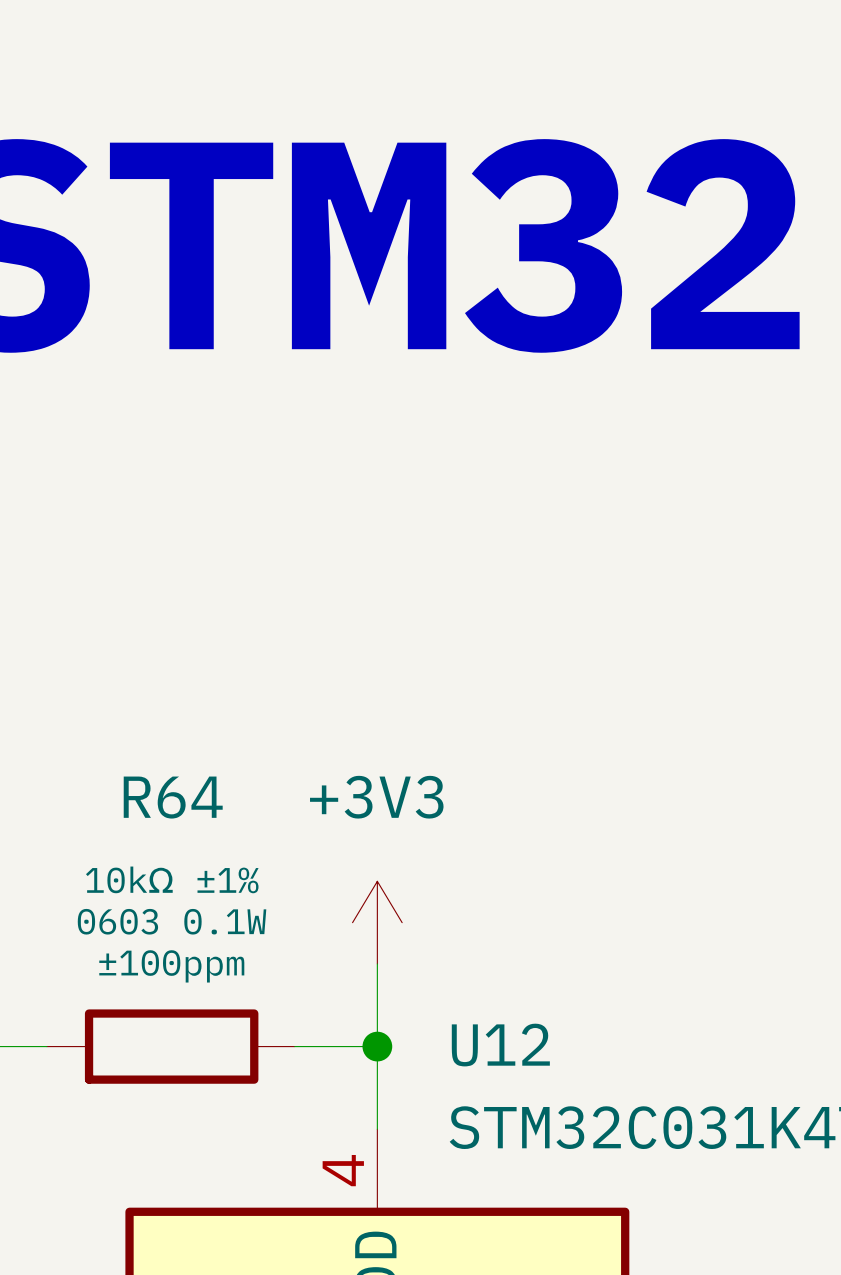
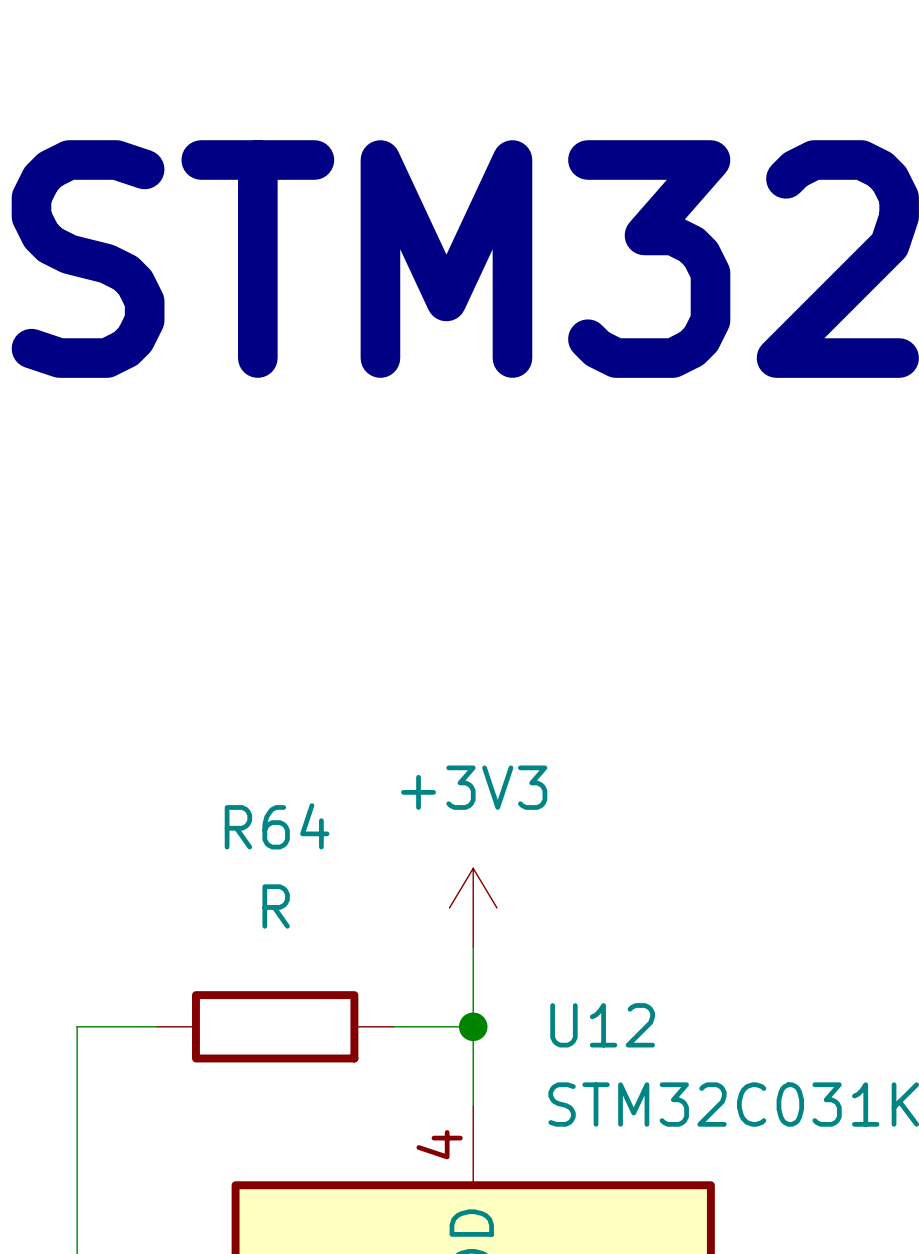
R64 name position: R64 (173, 797) -> R64 (277, 826)
R64 text: 10kΩ ±1% (172, 879) -> none
R64 value: none -> R (276, 906)
R64 text: 0603 0.1W (172, 921) -> none
R64 text: ±100ppm (171, 966) -> none

